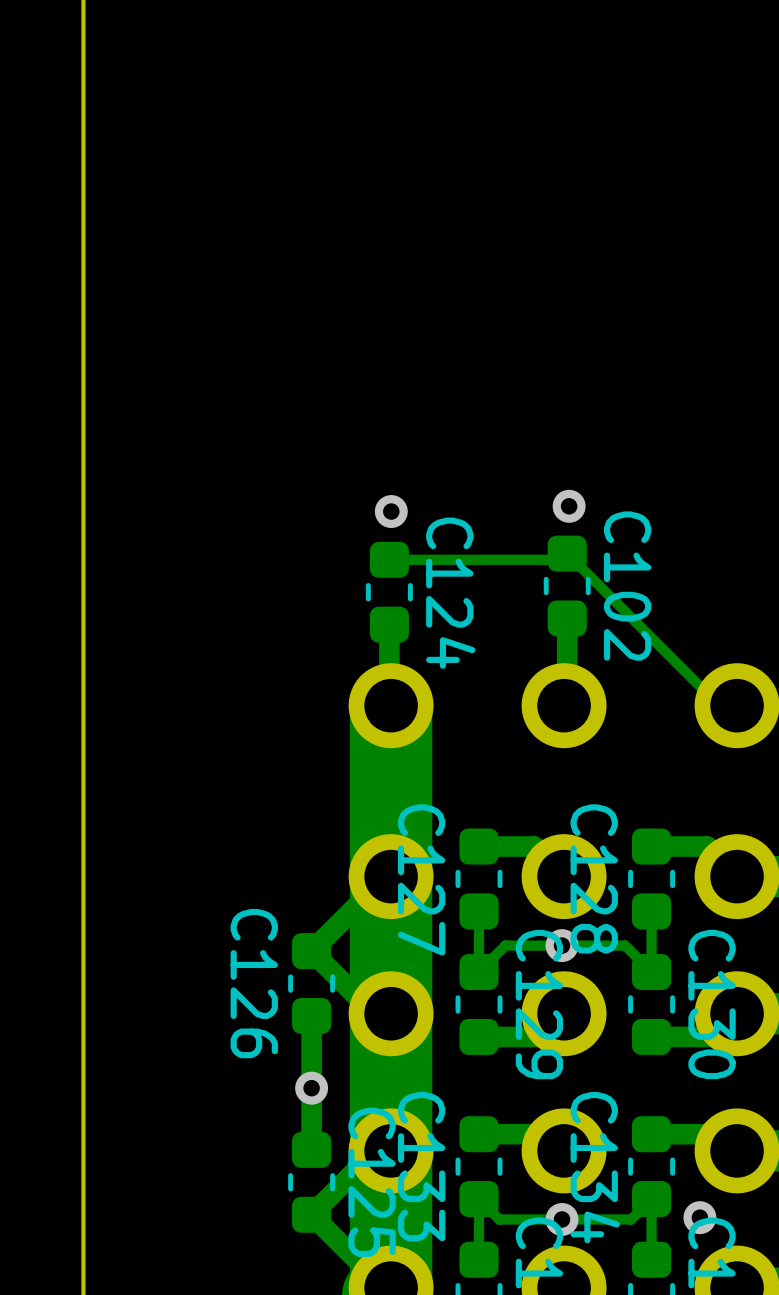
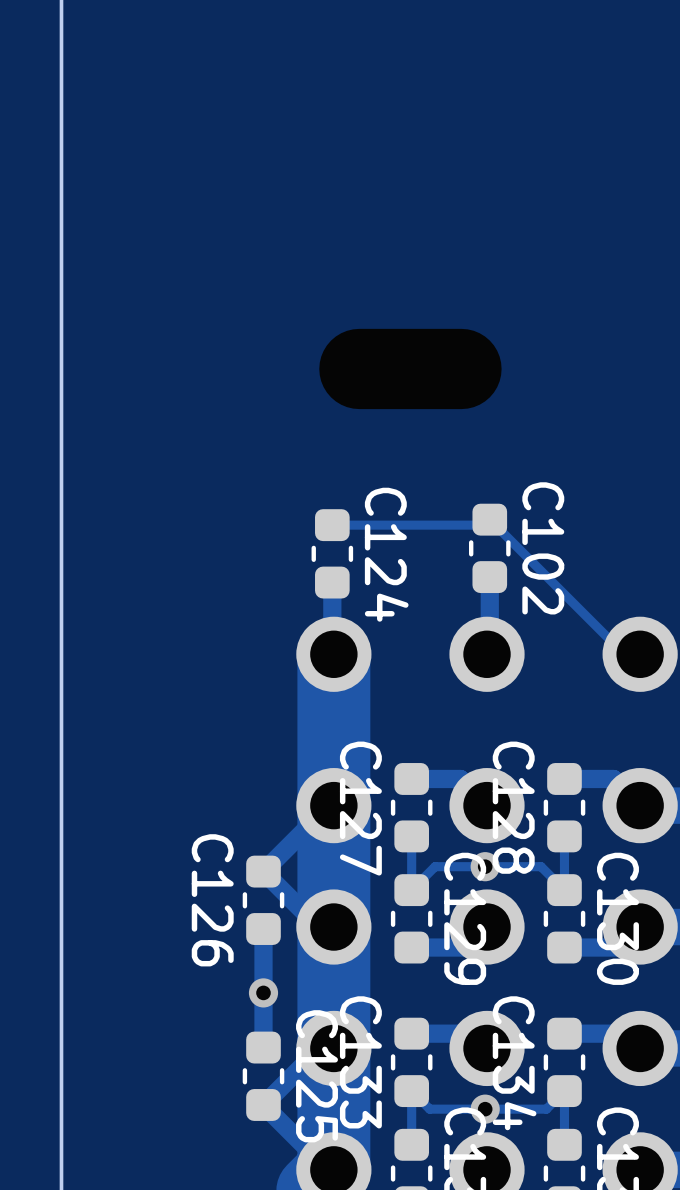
via: (569, 506) -> none
via: (391, 511) -> none
via: (699, 1217) -> none

